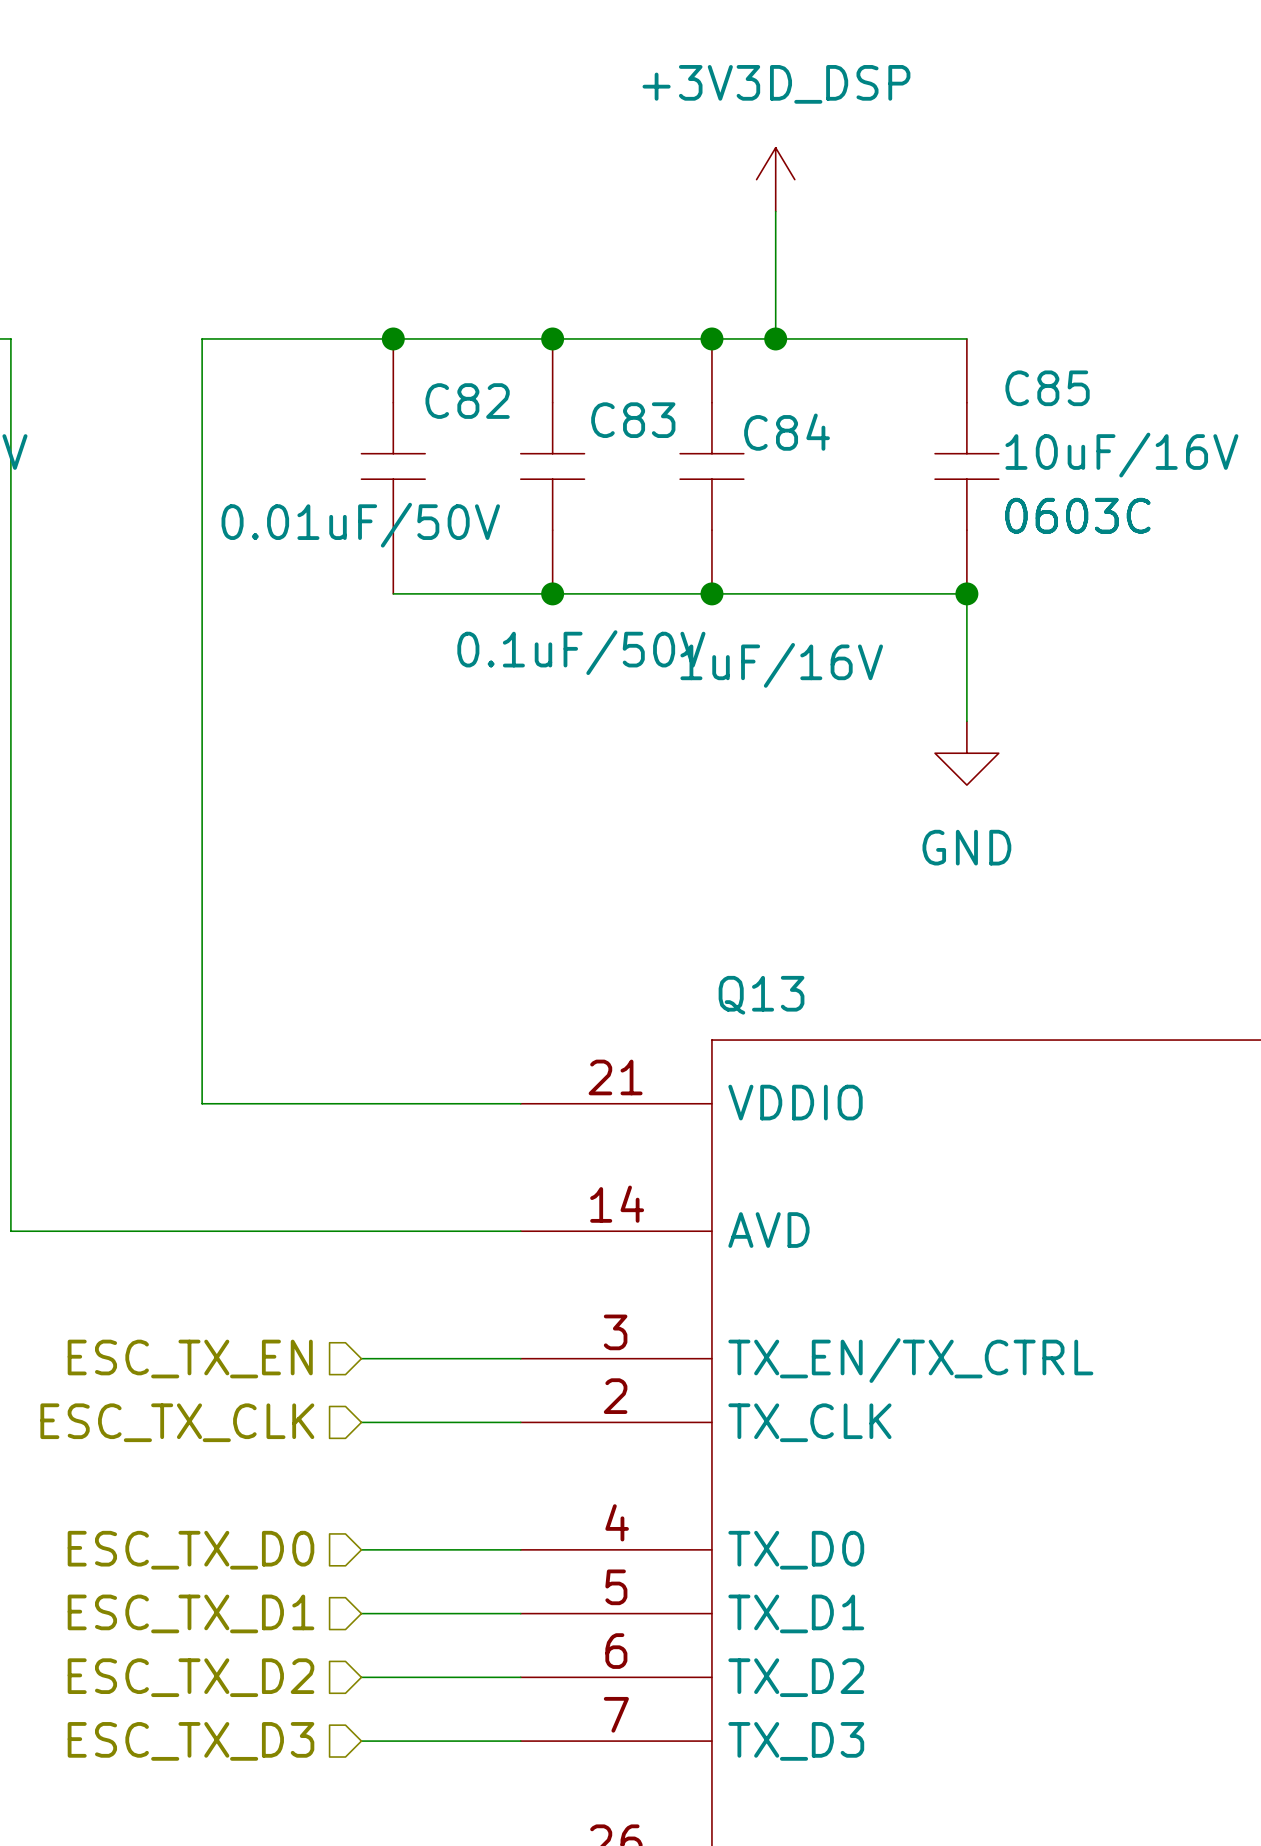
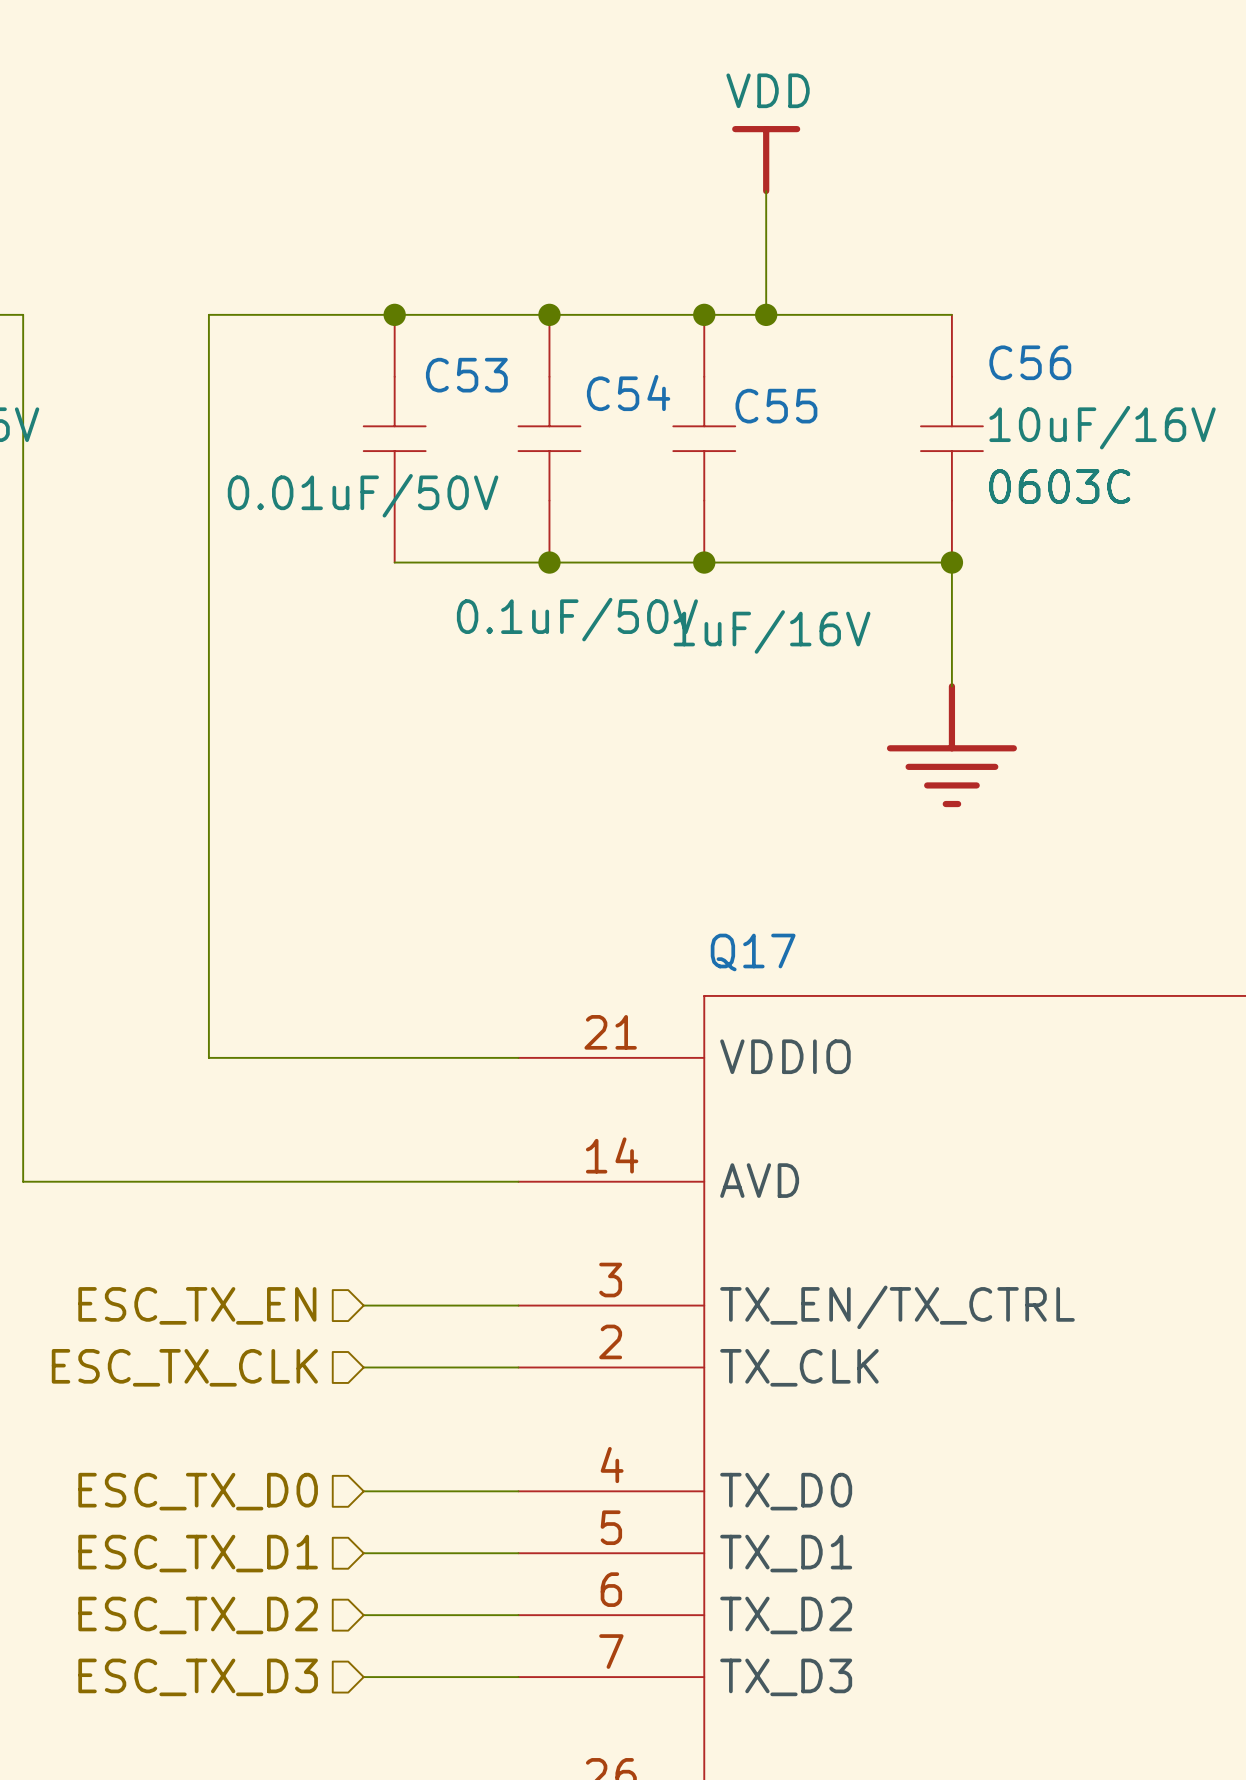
power symbol: +3V3D_DSP (775, 179) -> VDD (766, 160)
C85 name: C85 (1047, 388) -> C56 (1030, 362)
C82 name: C82 (467, 401) -> C53 (466, 375)
C83 name: C83 (633, 420) -> C54 (628, 393)
C84 name: C84 (787, 432) -> C55 (776, 406)
power symbol: GND (966, 753) -> none
power symbol: none -> (951, 745)
Q13 name: Q13 (761, 995) -> Q17 (753, 952)

